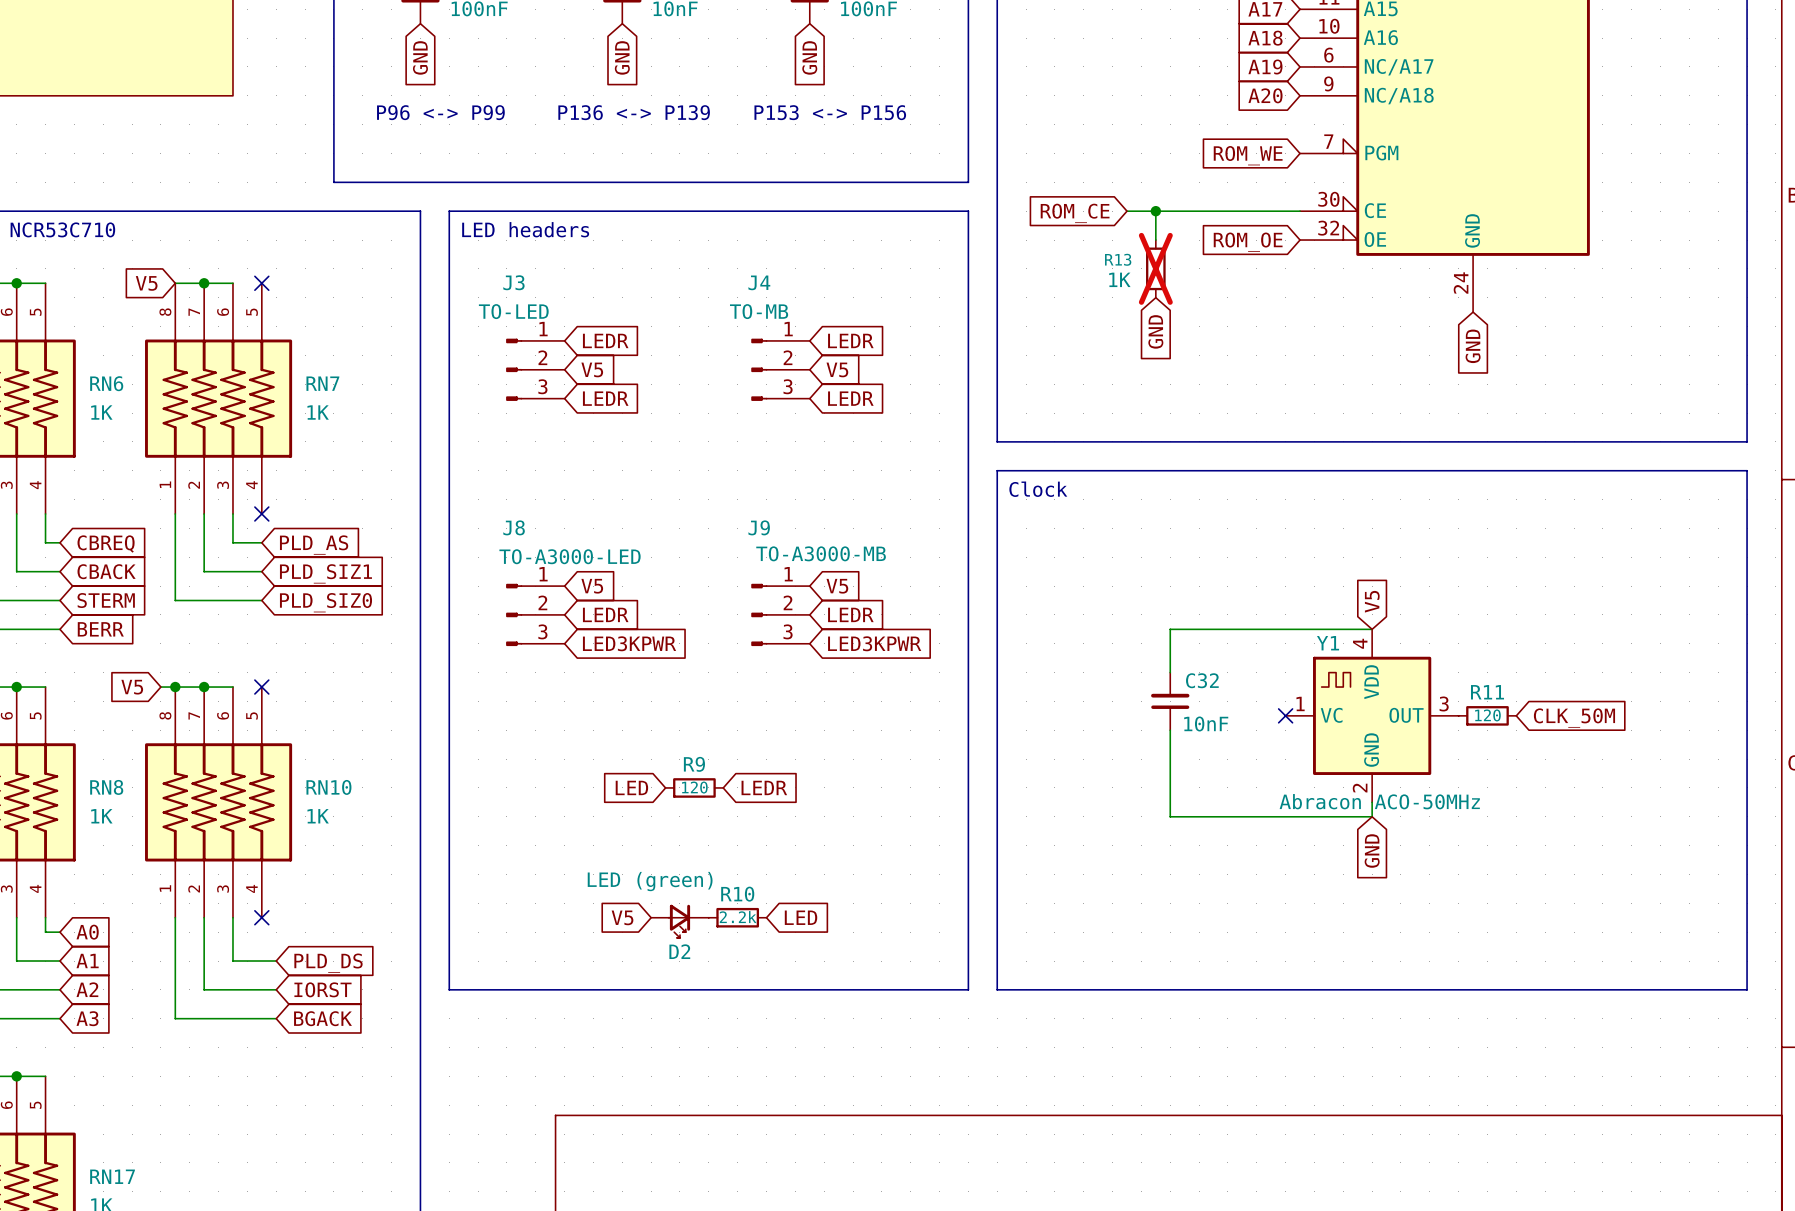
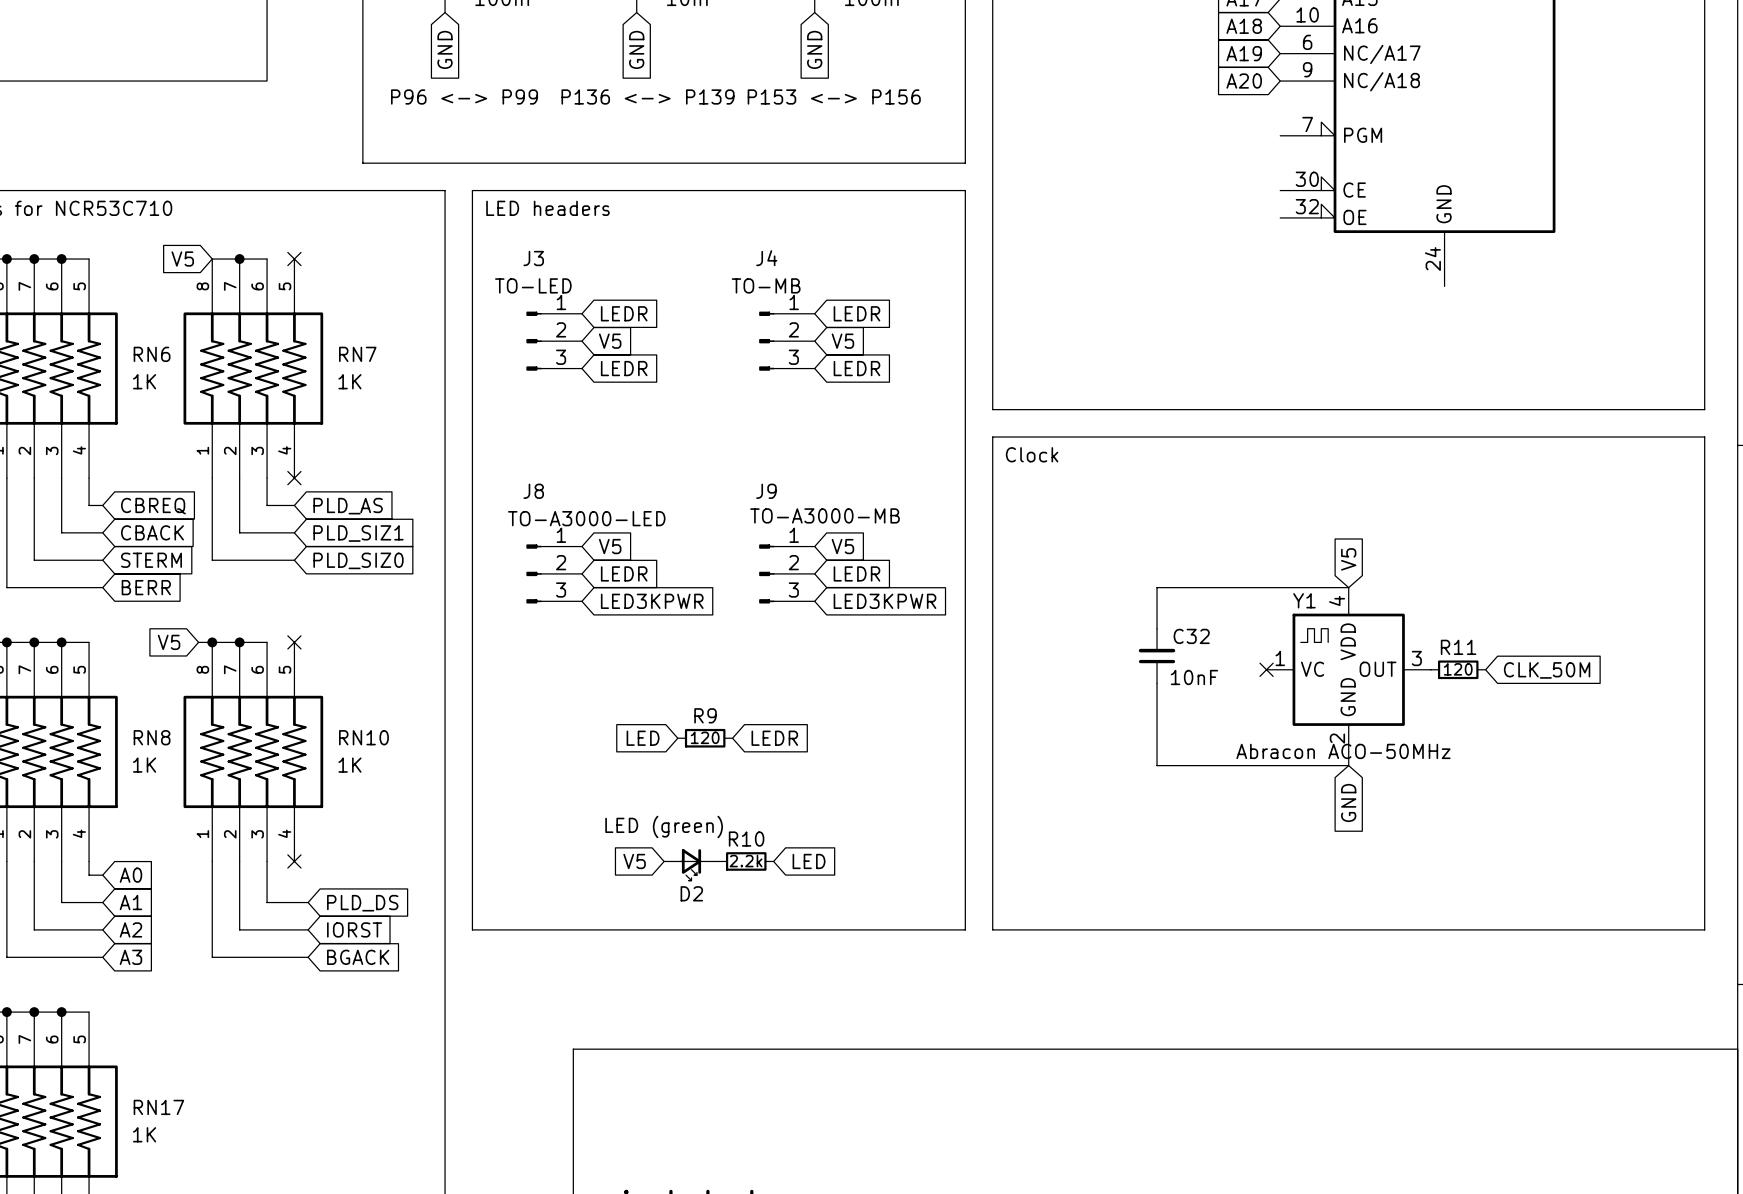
global label: ROM_WE (1248, 155) -> none
wire: (1127, 211) (1300, 211) -> none
wire: (1155, 211) (1155, 240) -> none
junction: (1155, 211) -> none
global label: ROM_CE (1075, 213) -> none
global label: ROM_OE (1248, 242) -> none
R13: 1K (1155, 268) -> none
global label: GND (1155, 331) -> none
global label: GND (1473, 346) -> none

